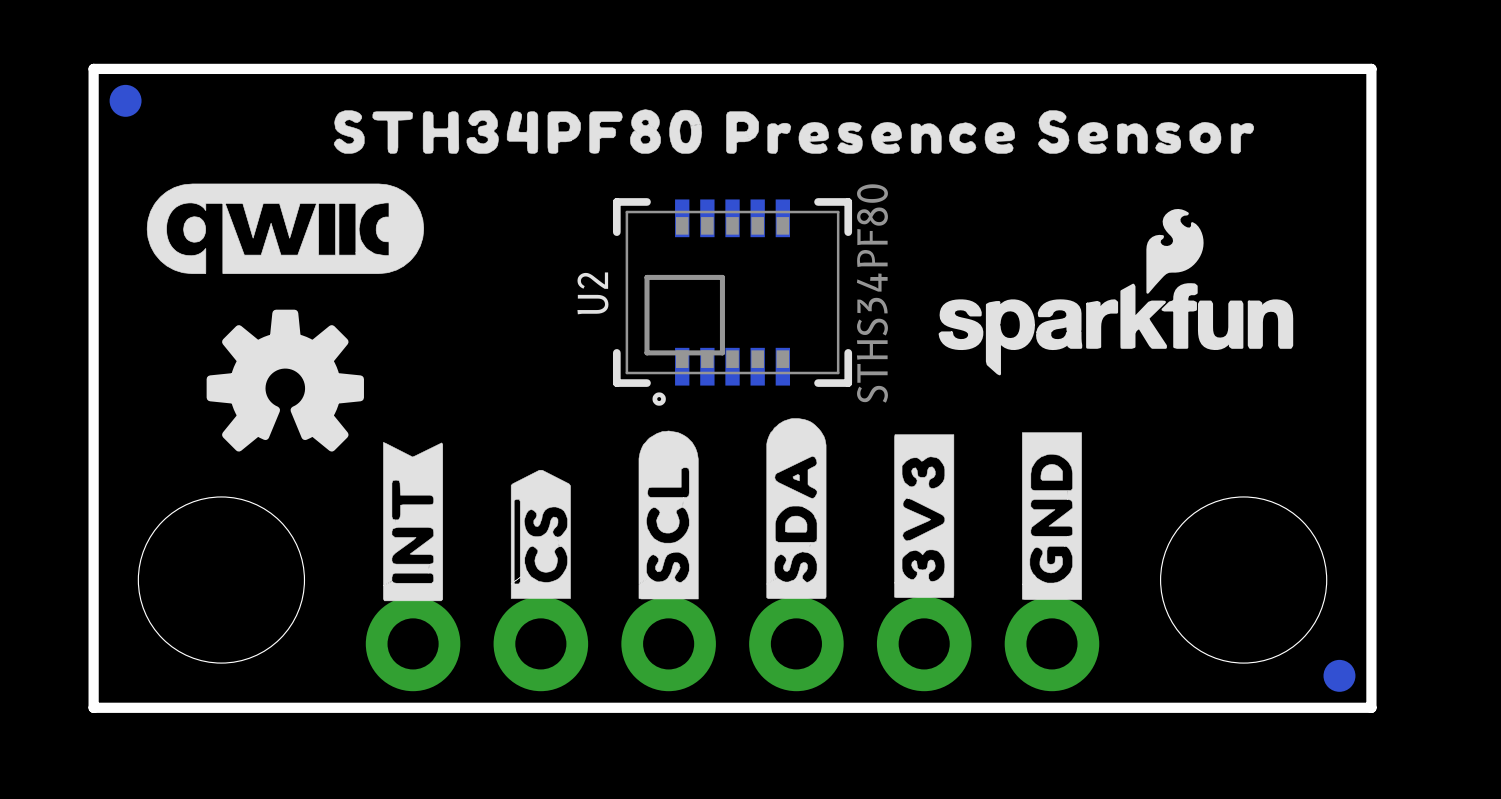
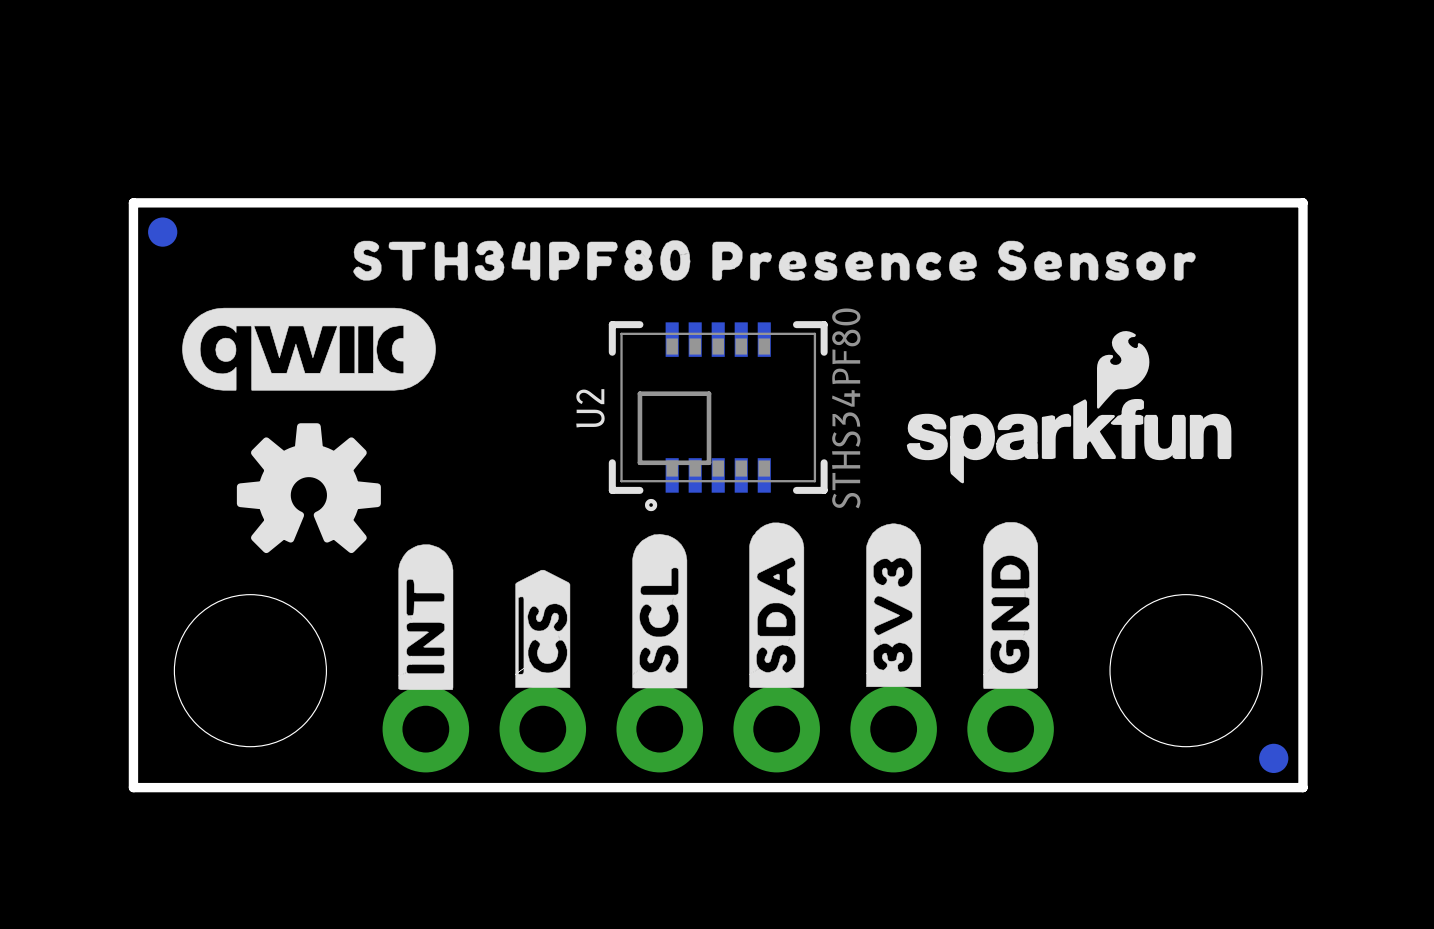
drawing shape: [1022, 432, 1082, 600] -> [983, 522, 1039, 689]
drawing shape: [894, 434, 955, 598] -> [866, 523, 922, 688]
drawing shape: [383, 442, 444, 602] -> [398, 544, 454, 690]

